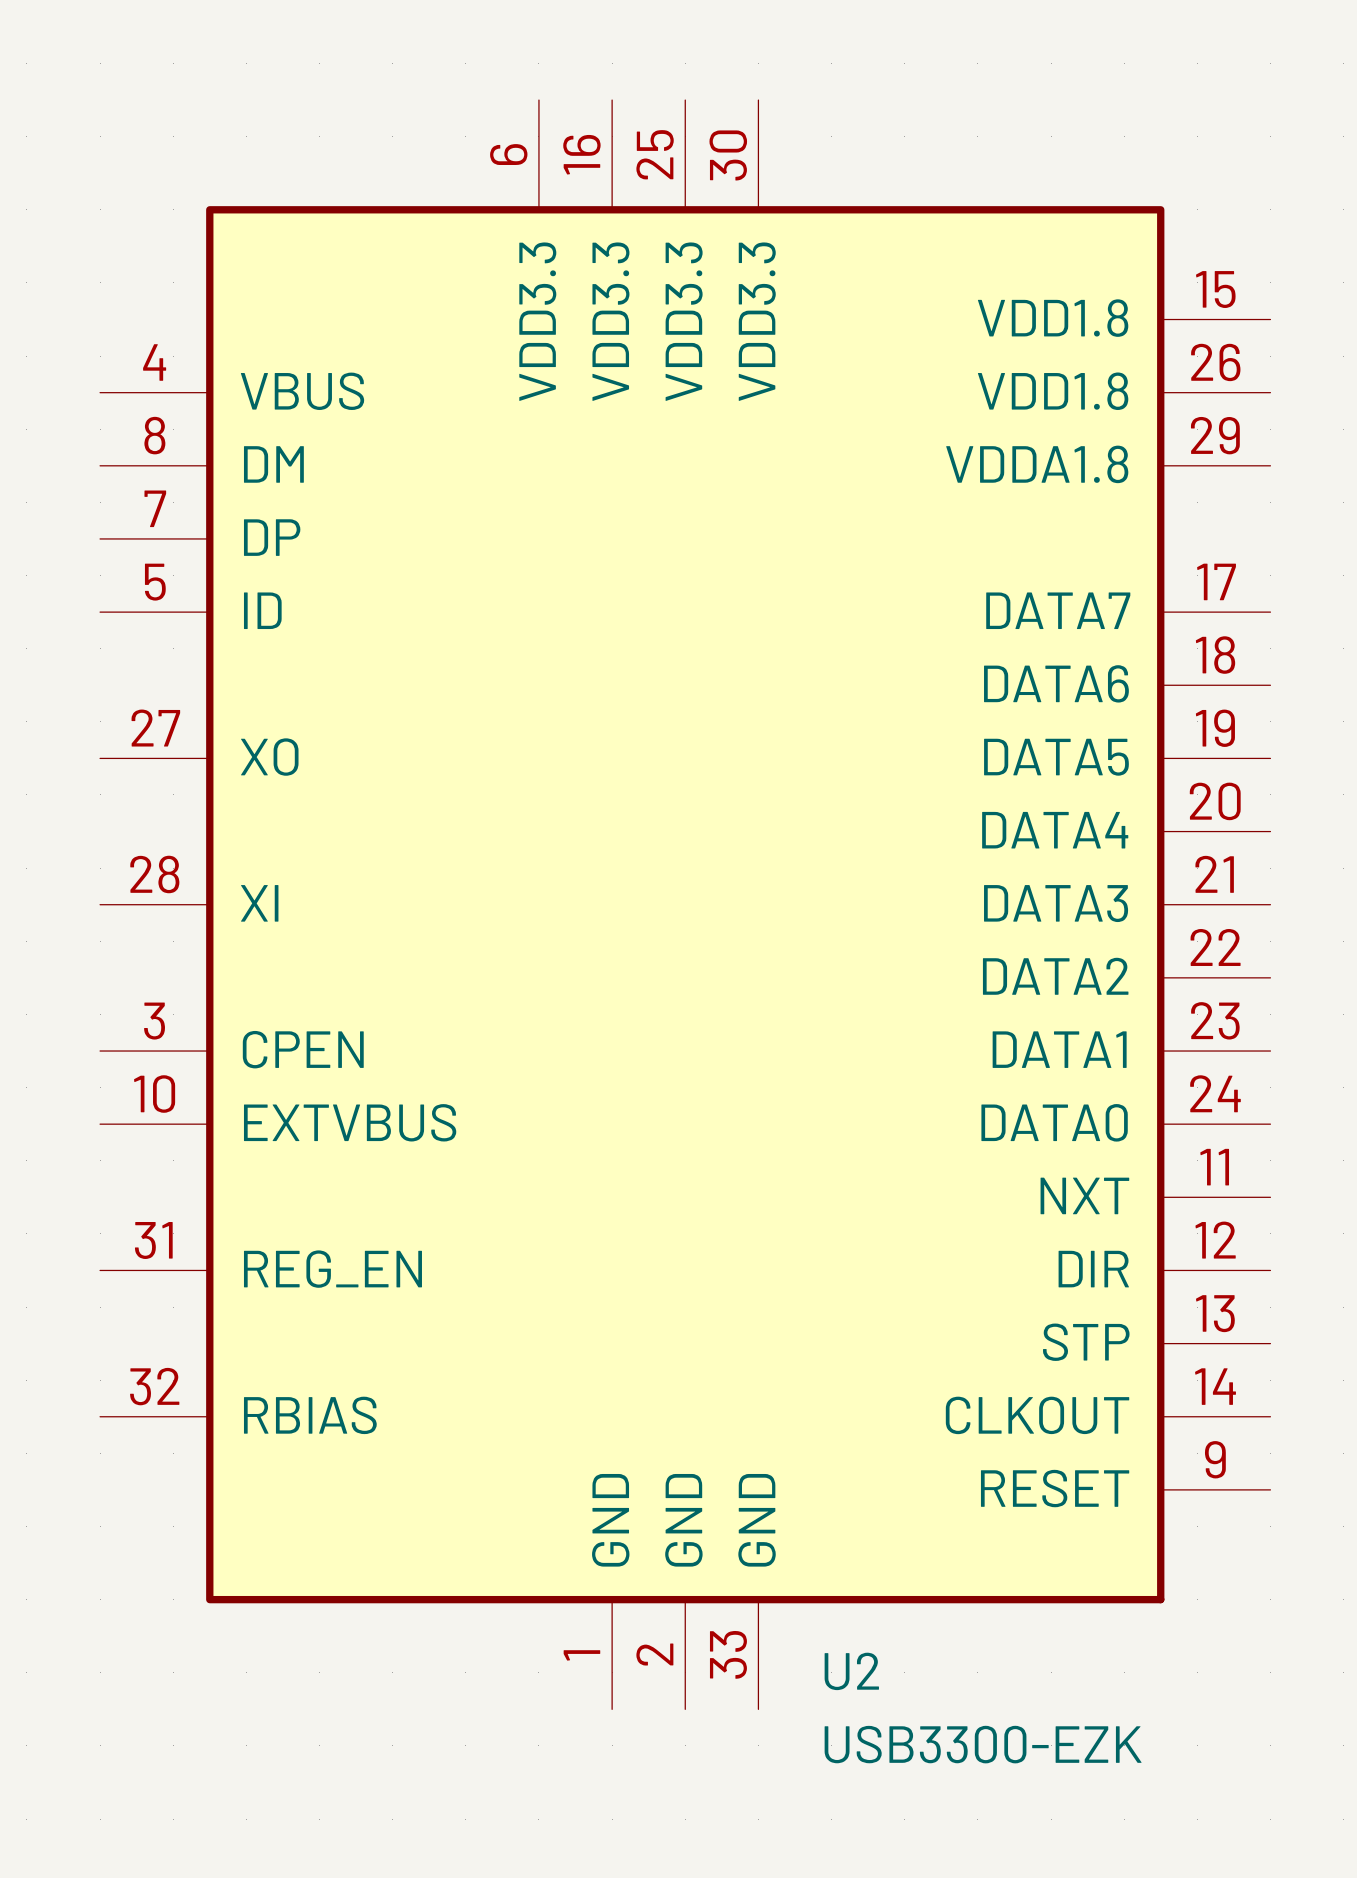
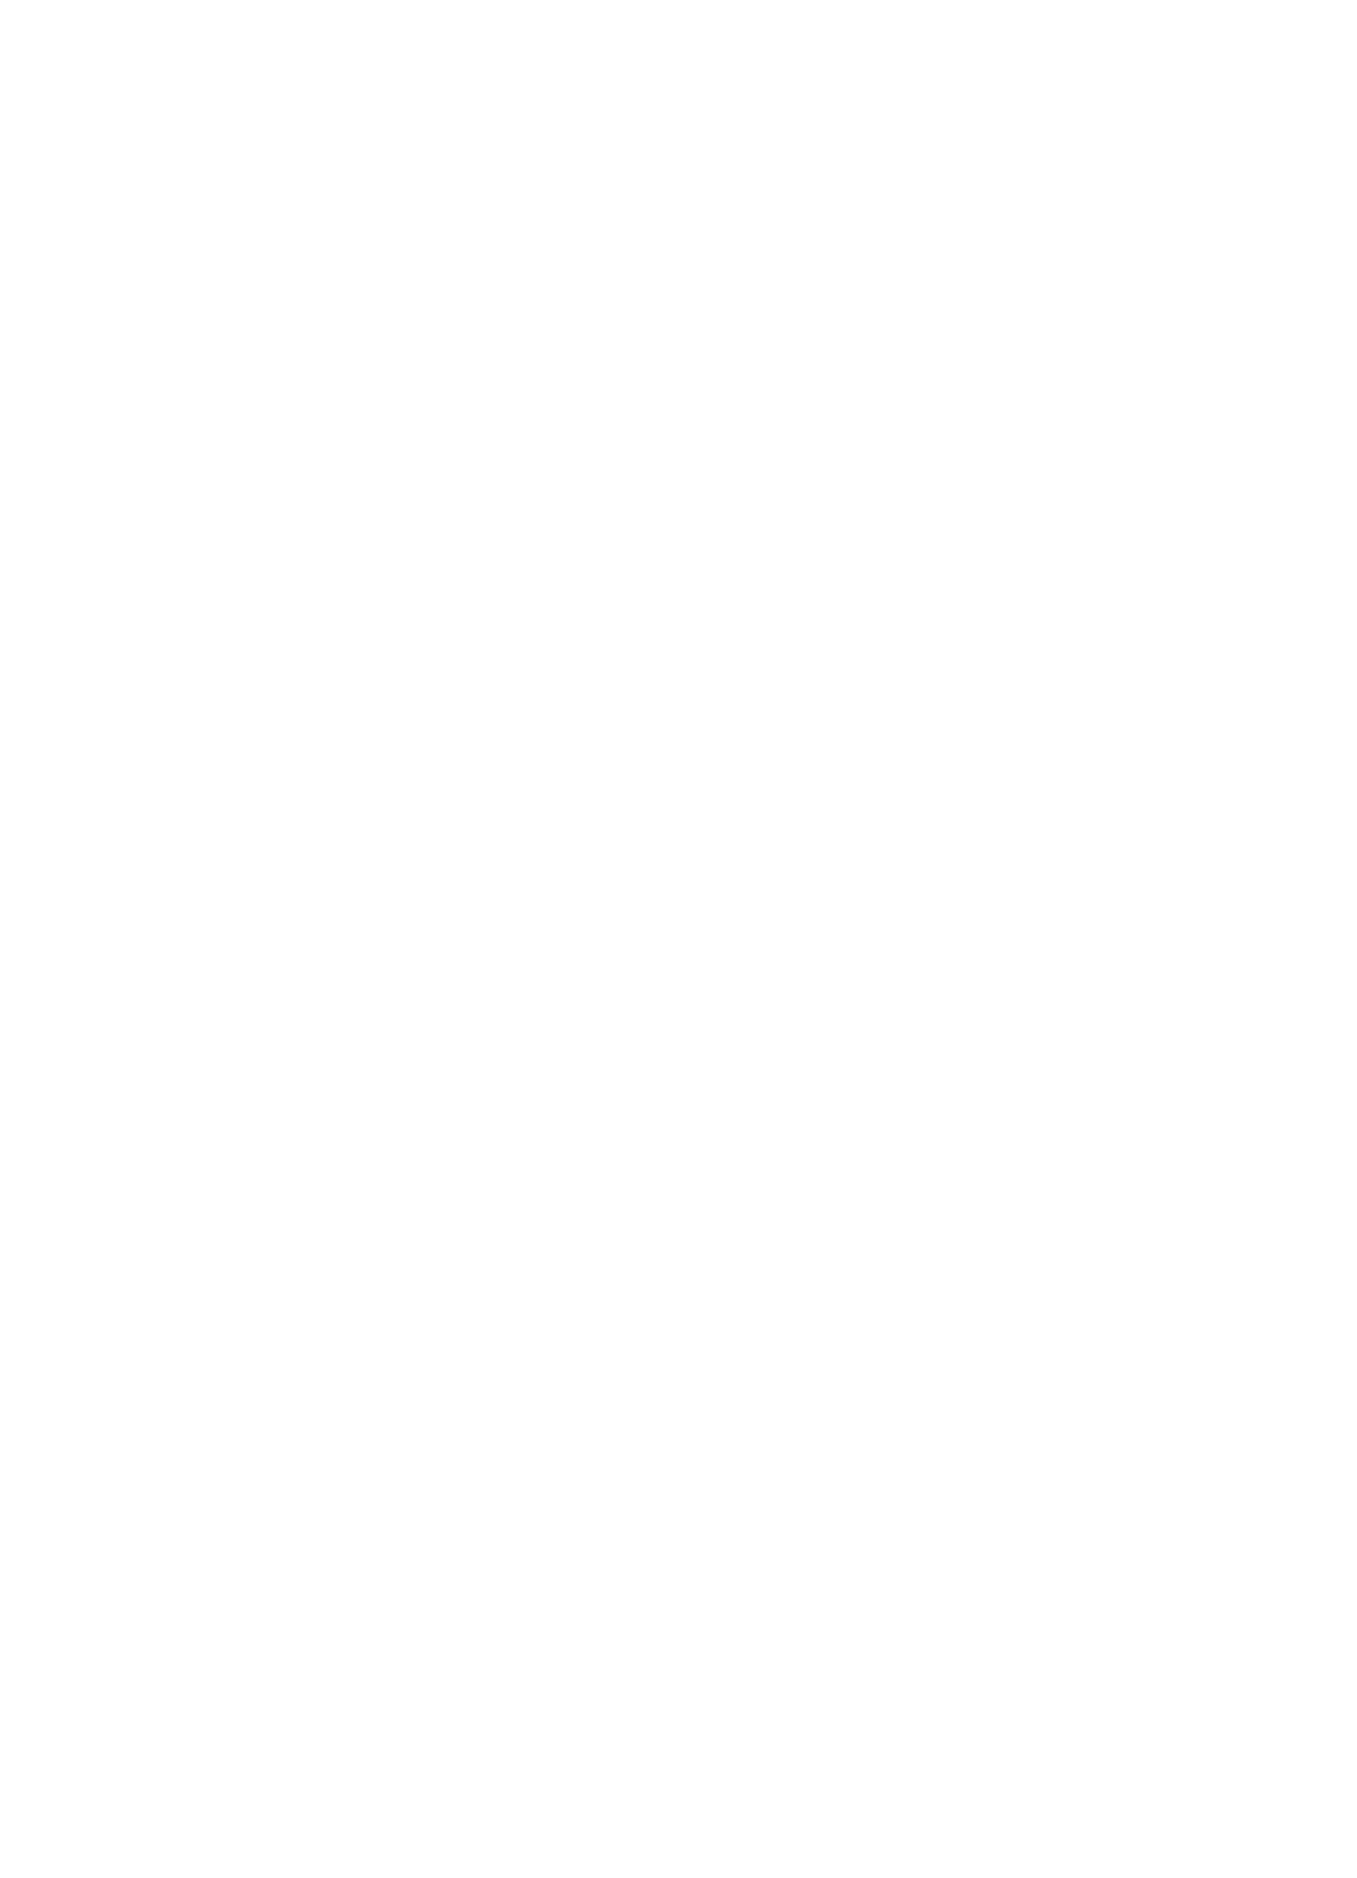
U2: USB3300-EZK (685, 904) -> none

